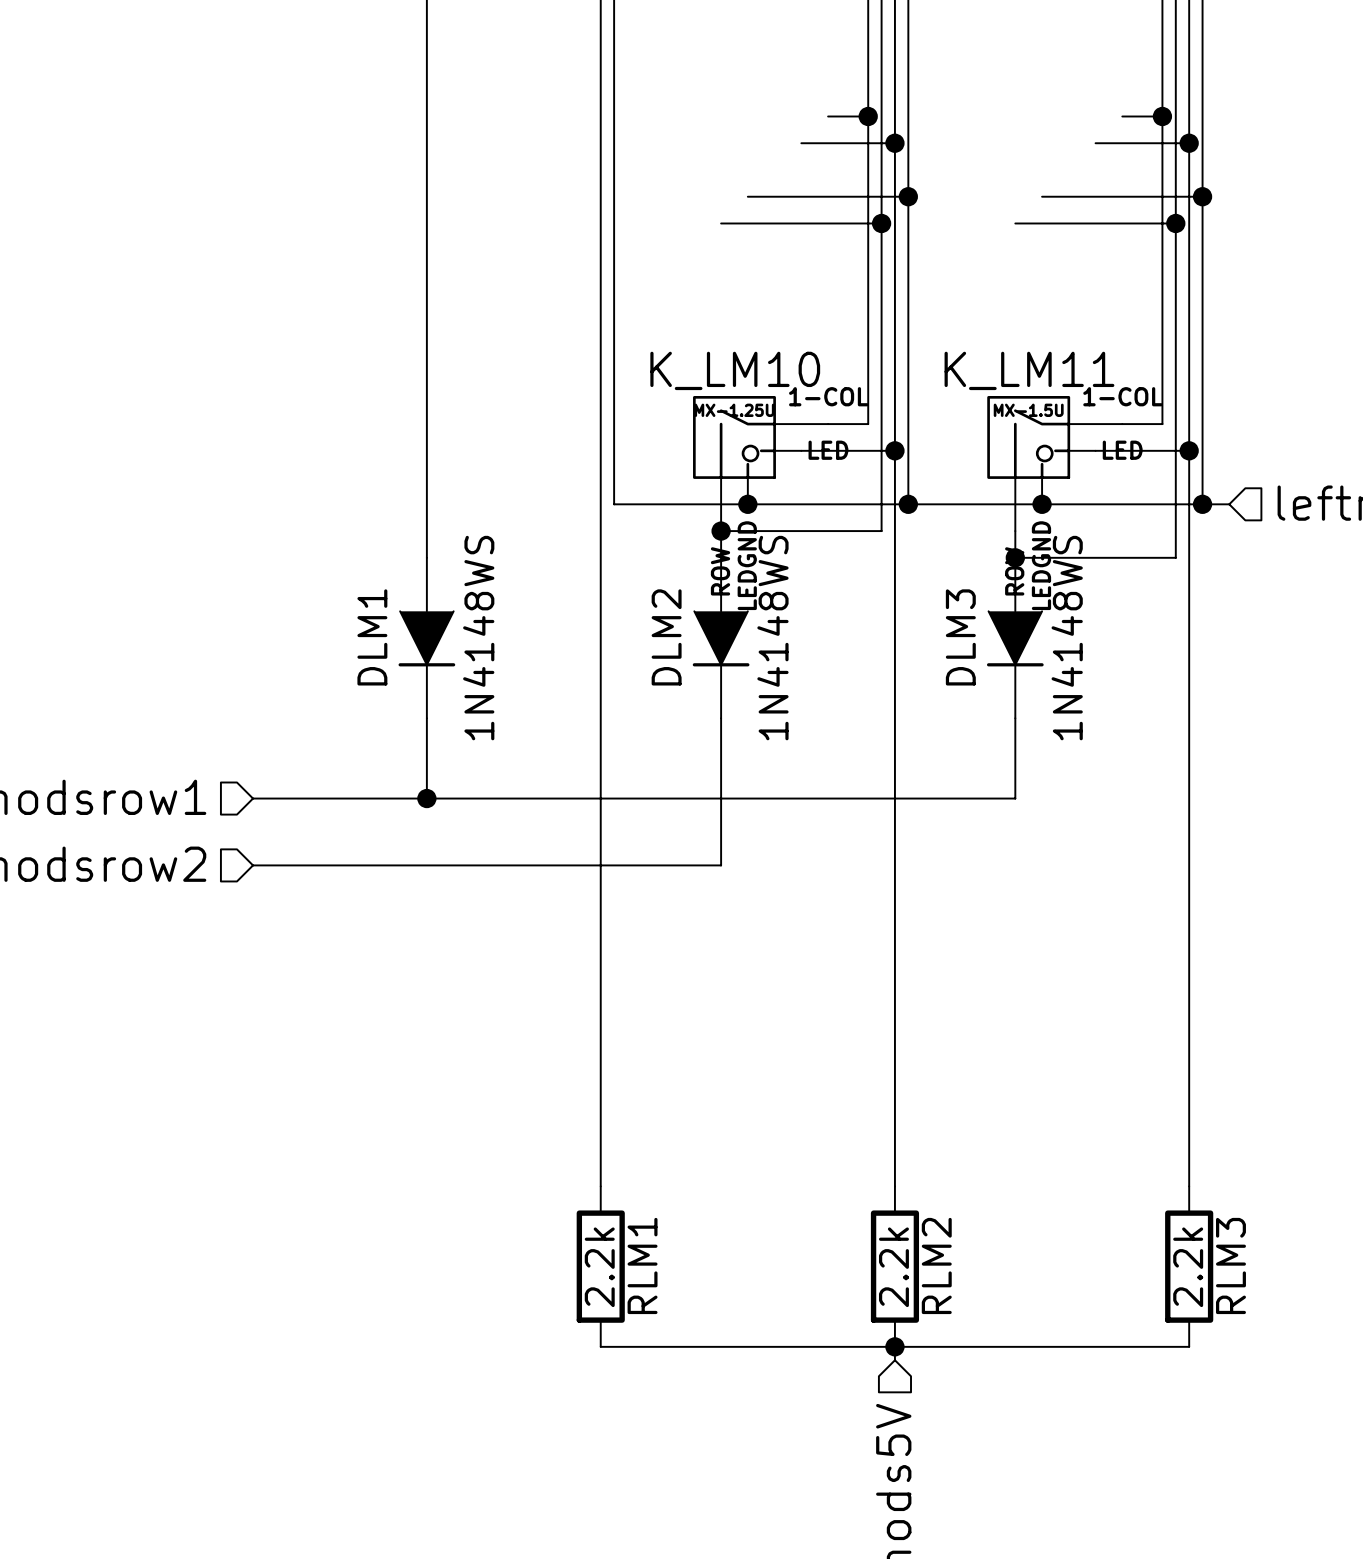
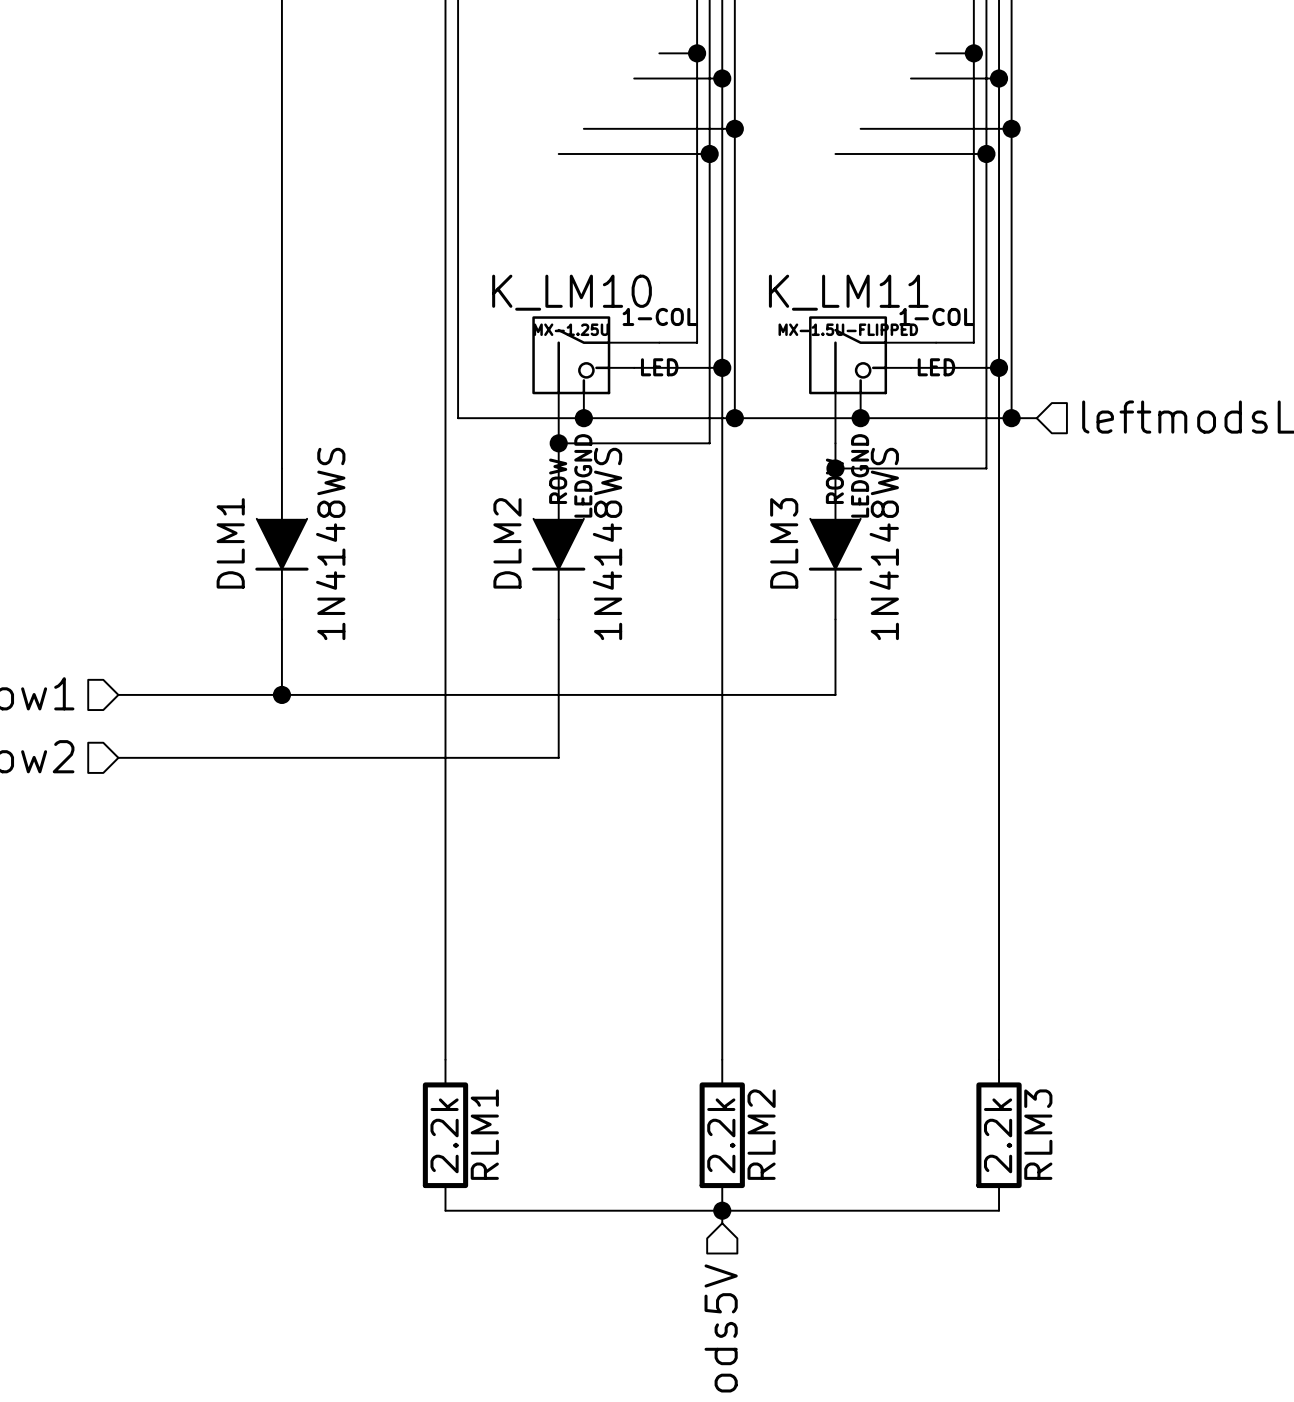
K_LM11 value: MX-1.5U (1028, 410) -> MX-1.5U-FLIPPED (848, 329)

